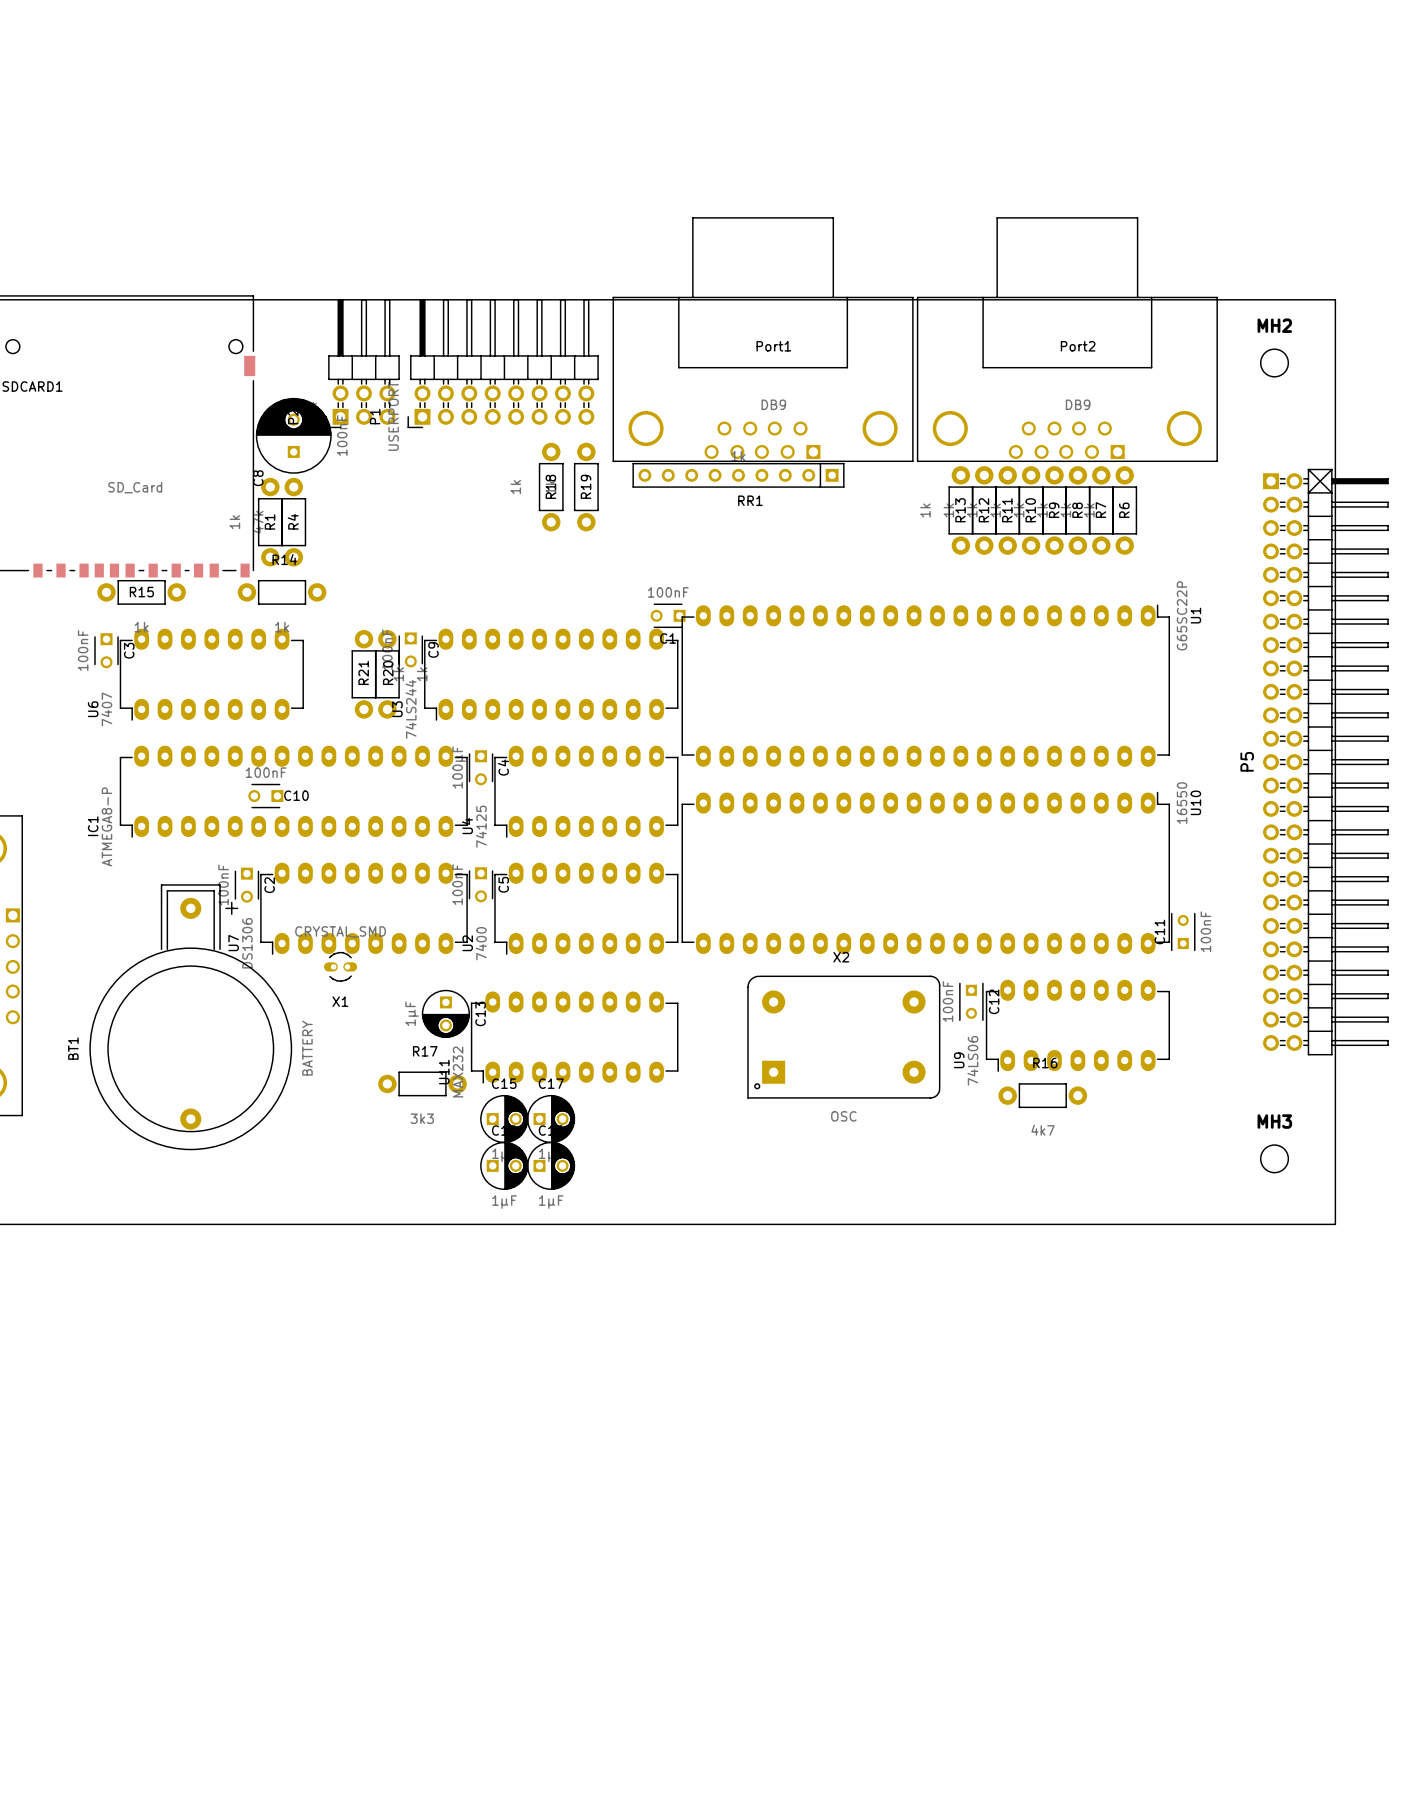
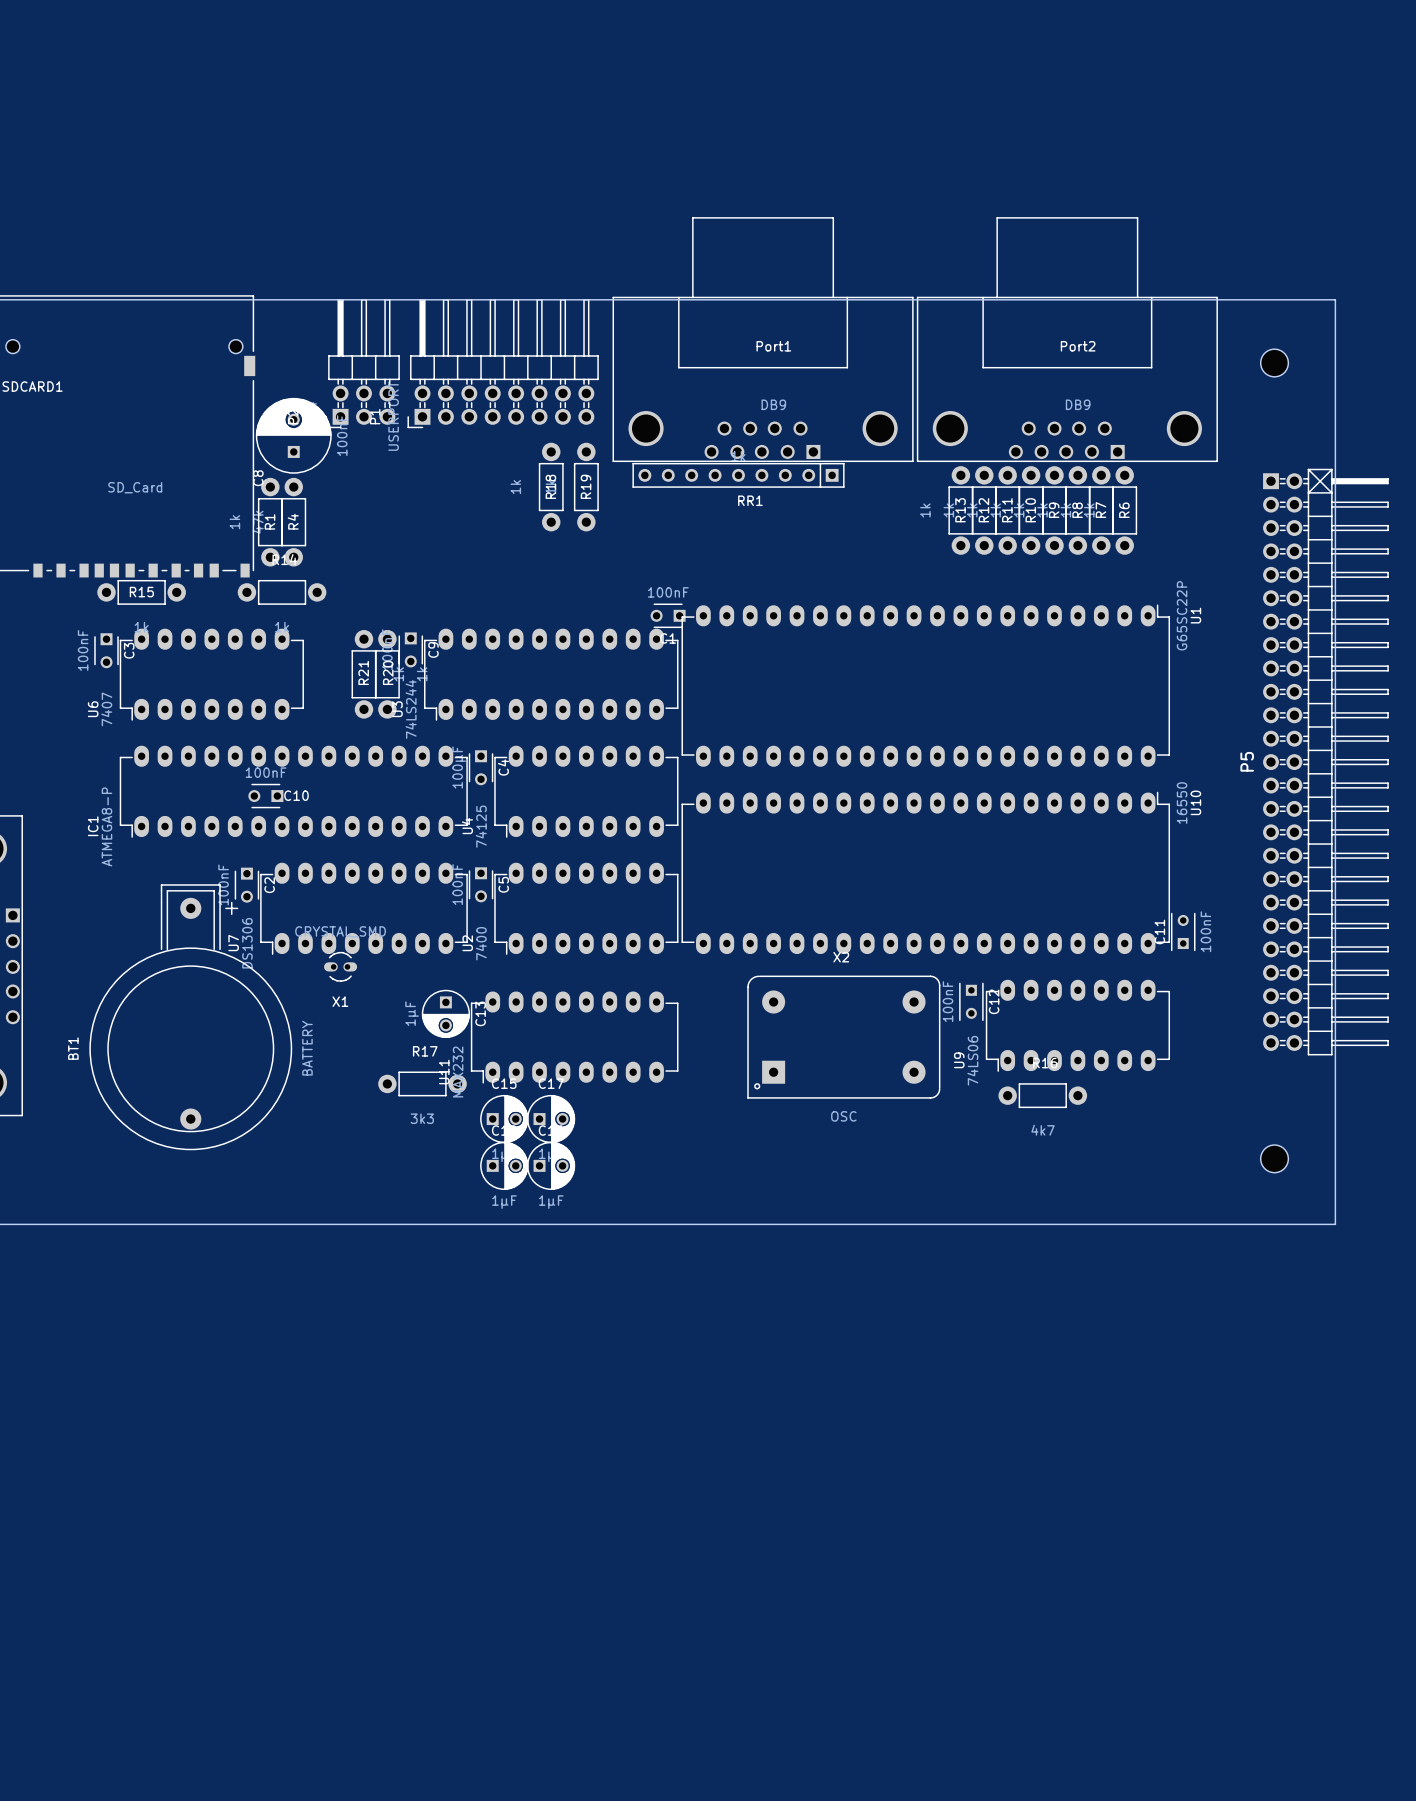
MH2 name: MH2 (1274, 325) -> none
MH3 name: MH3 (1274, 1121) -> none

